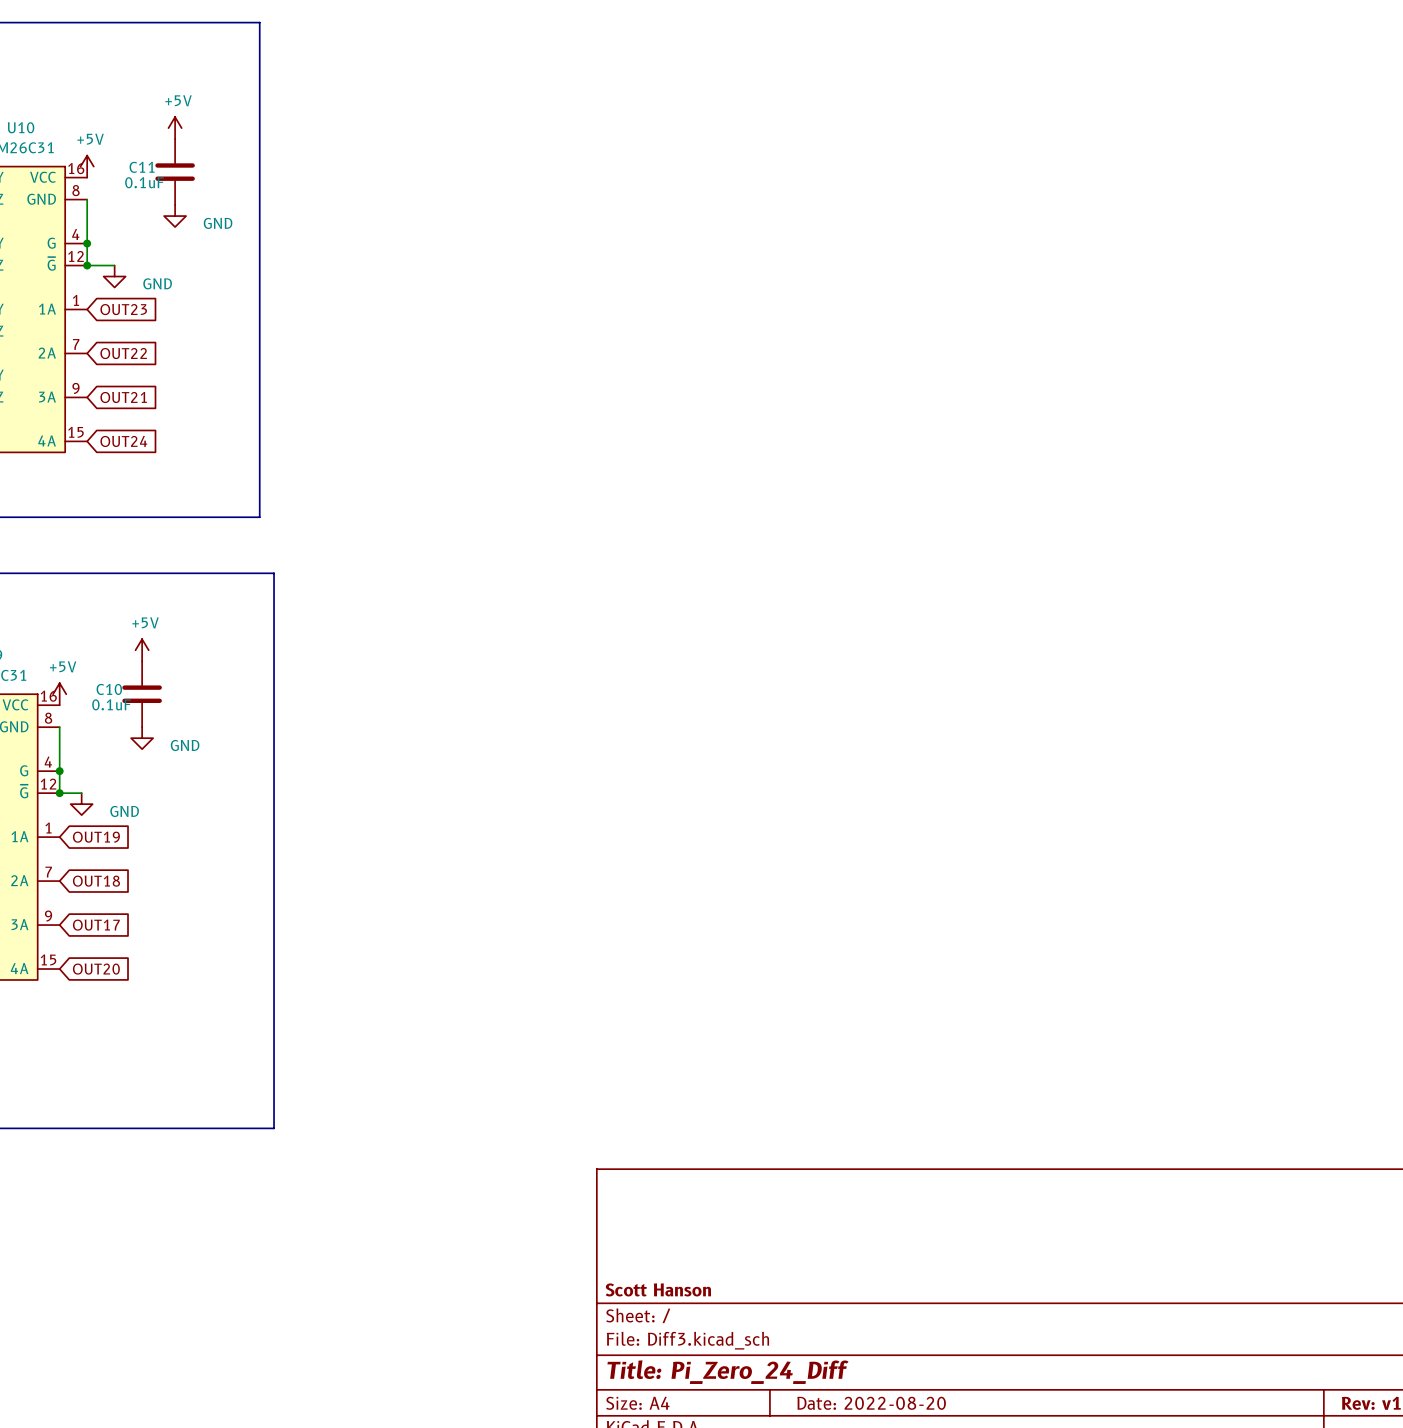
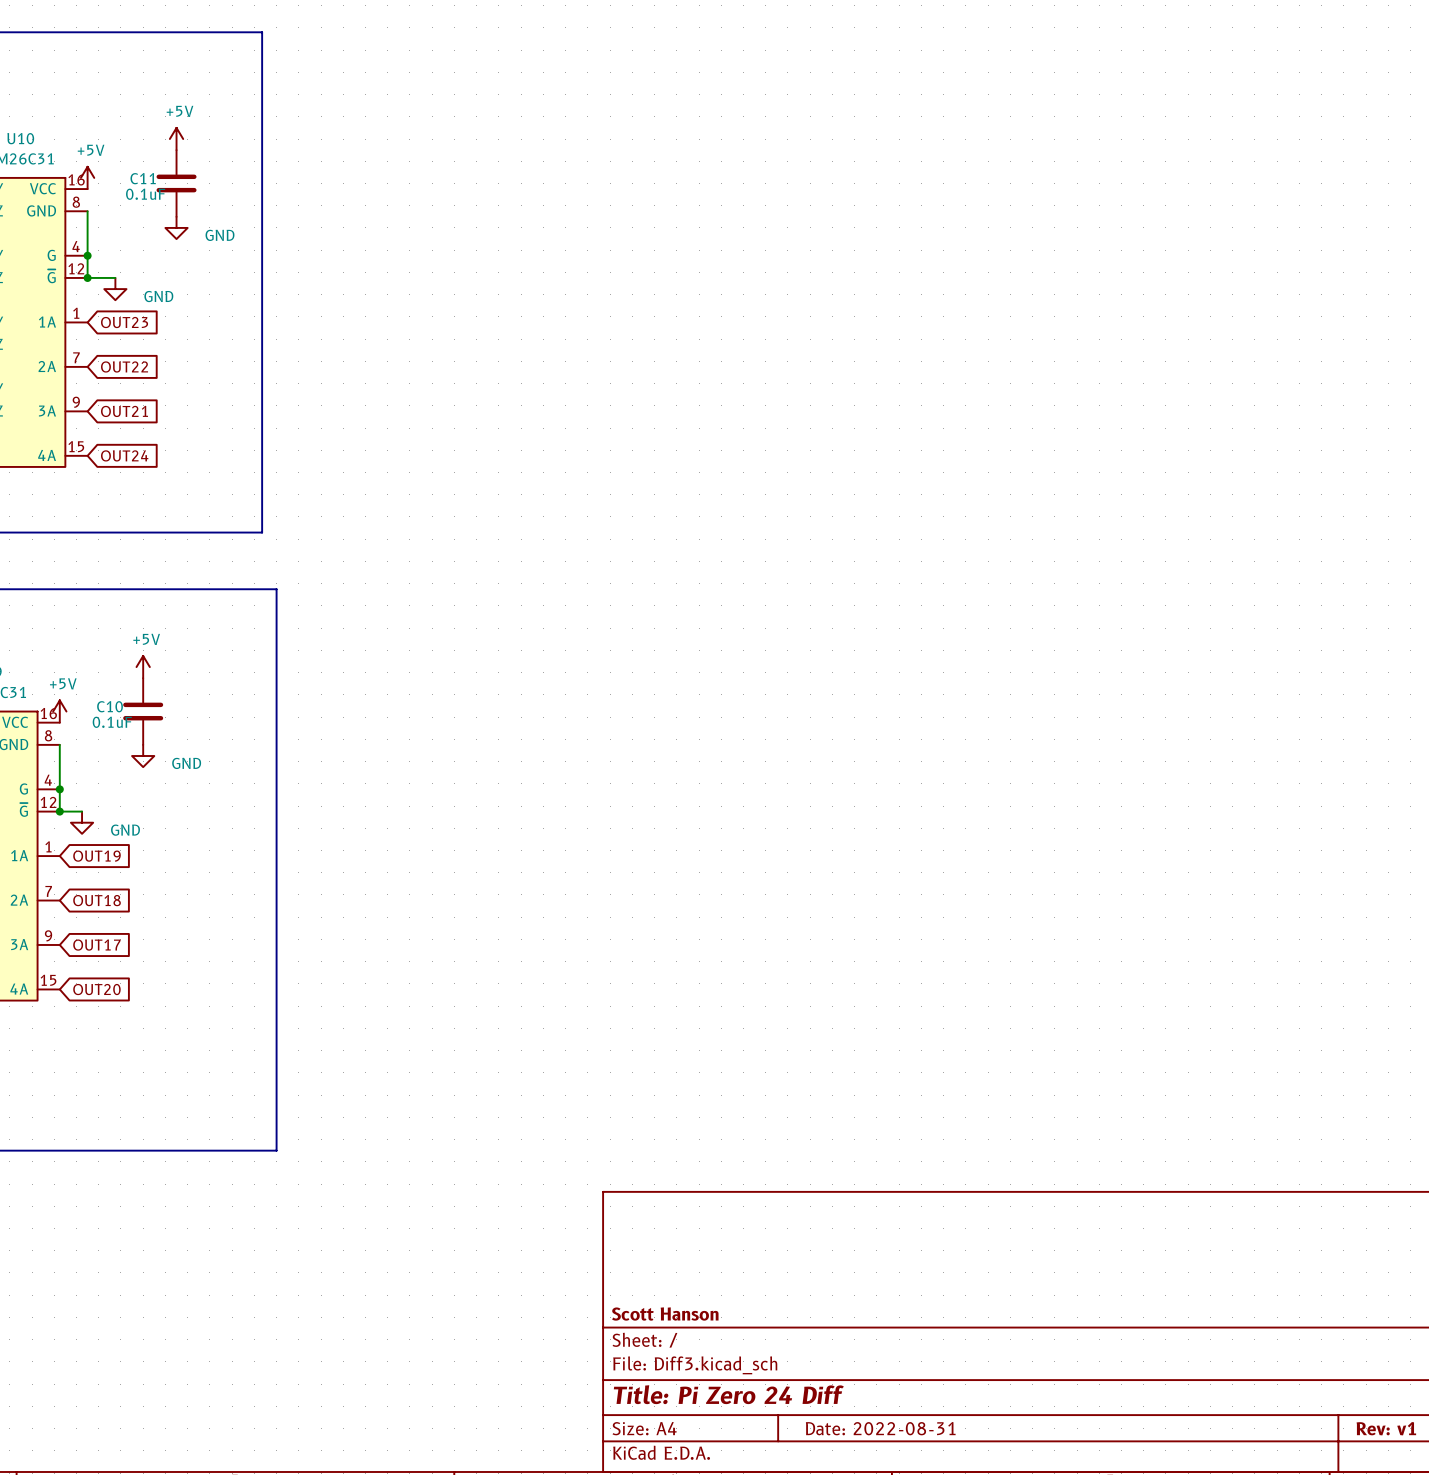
title block: Title: Pi_Zero_24_Diff (728, 1372) -> Title: Pi Zero 24 Diff (728, 1394)
title block: Date: 2022-08-20 (871, 1403) -> Date: 2022-08-31 (880, 1428)

